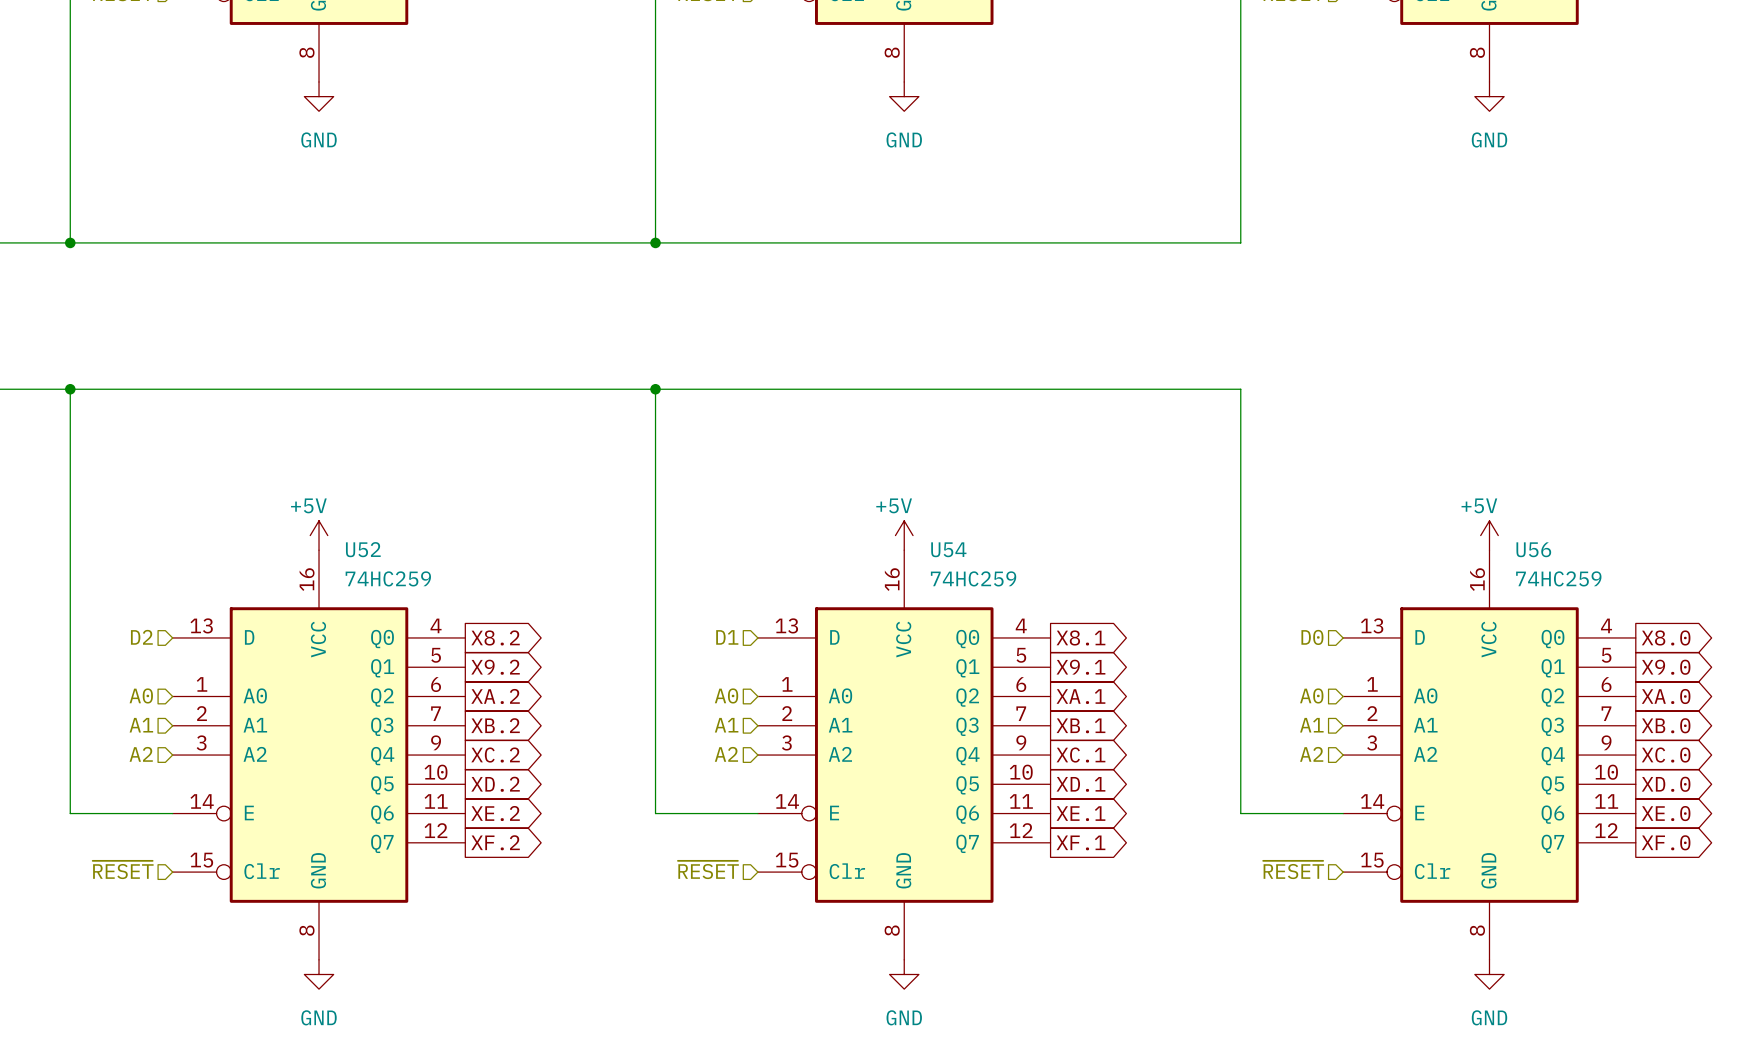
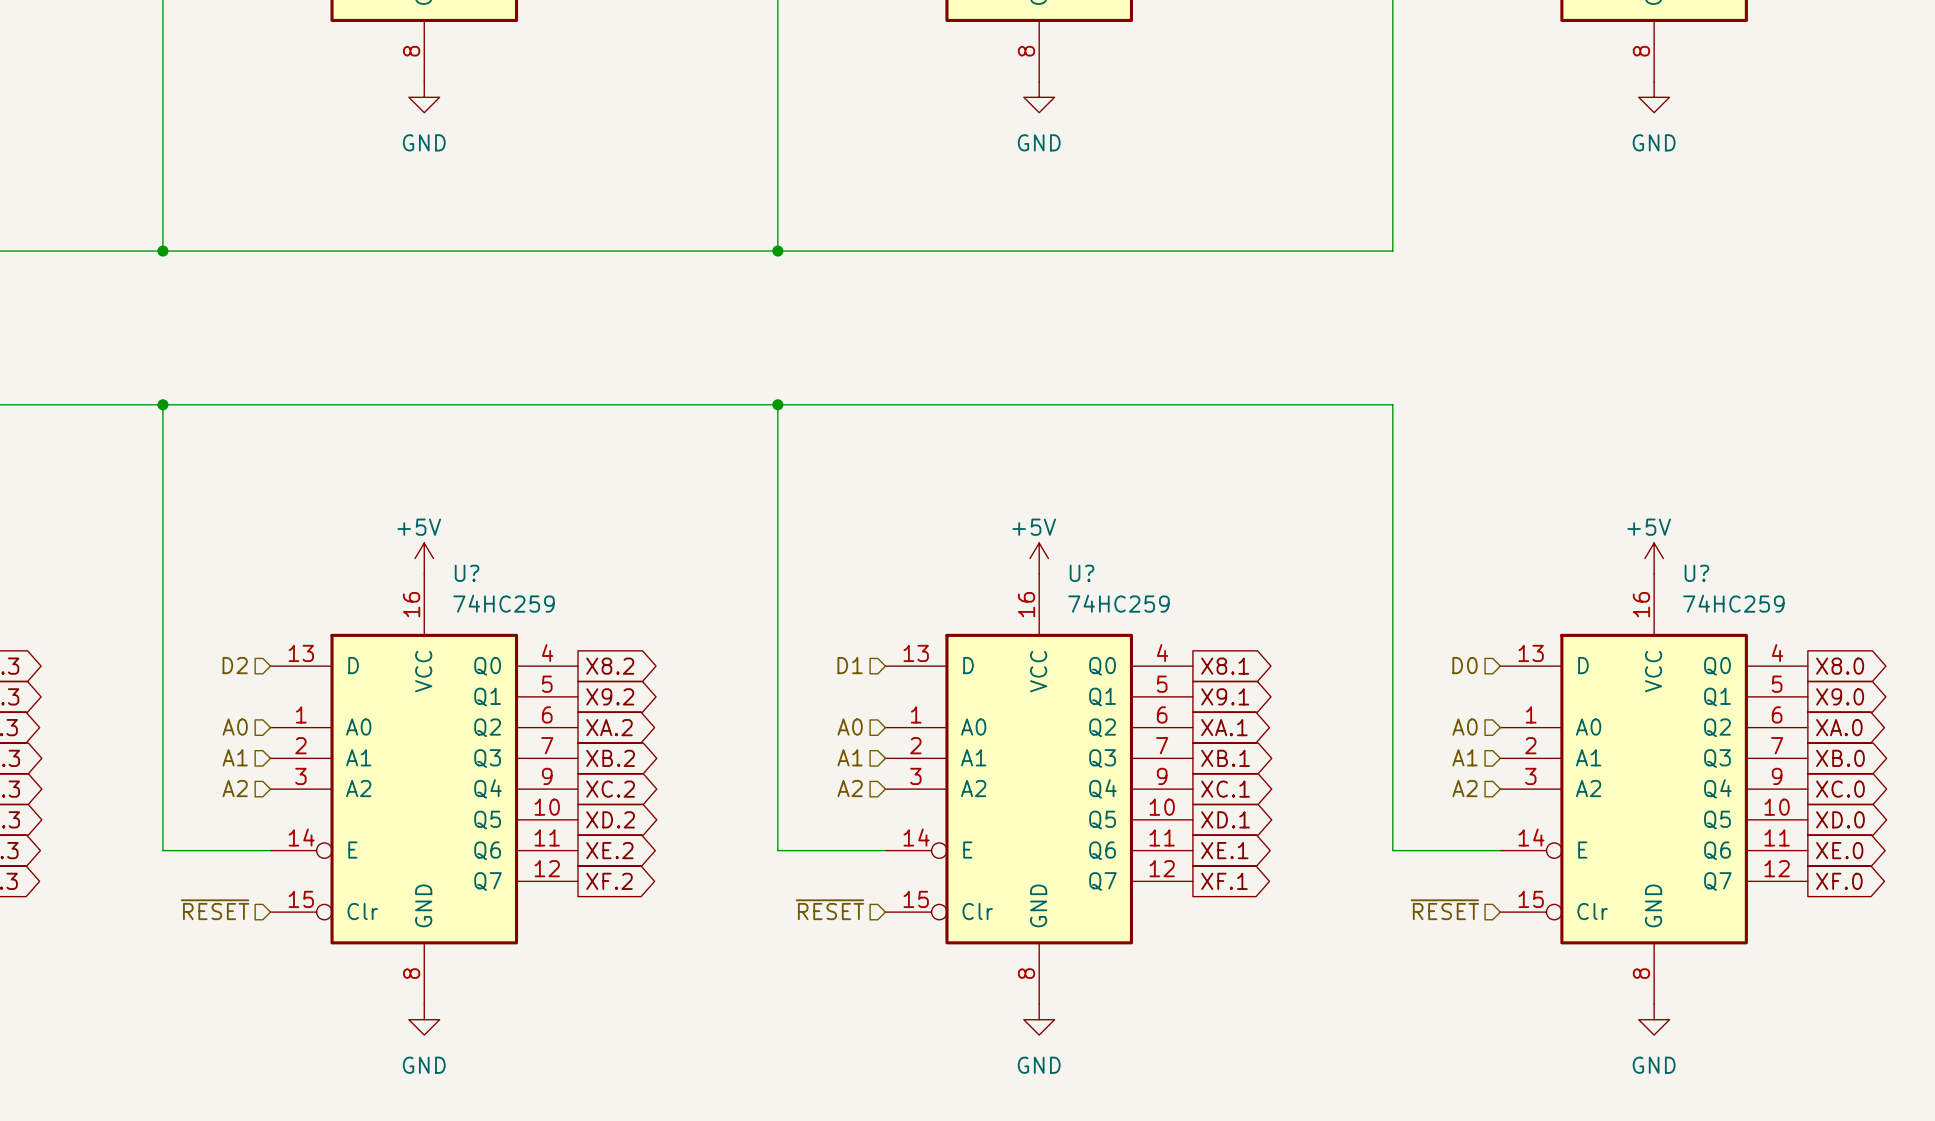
U52 name: U52 (363, 549) -> U? (467, 573)
U54 name: U54 (948, 549) -> U? (1081, 573)
U56 name: U56 (1533, 549) -> U? (1696, 573)

